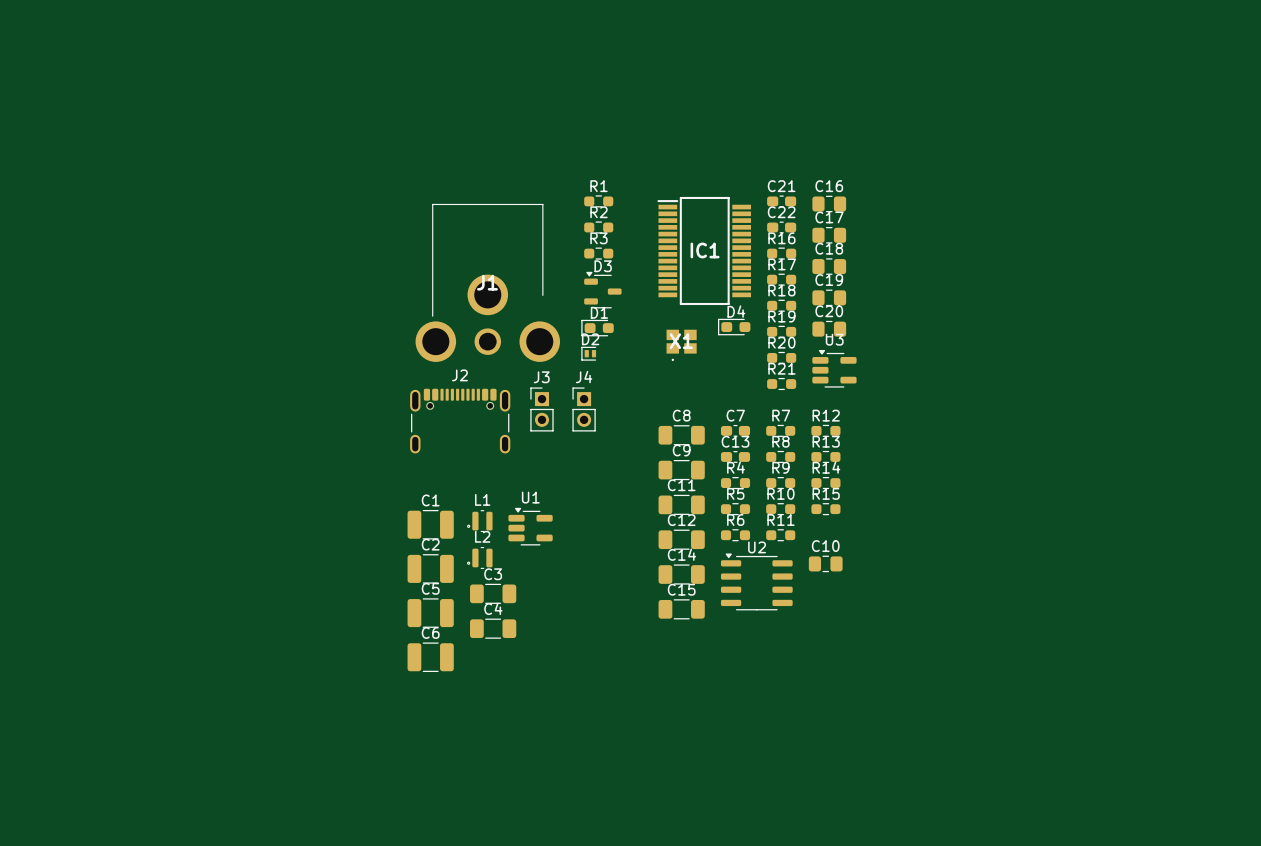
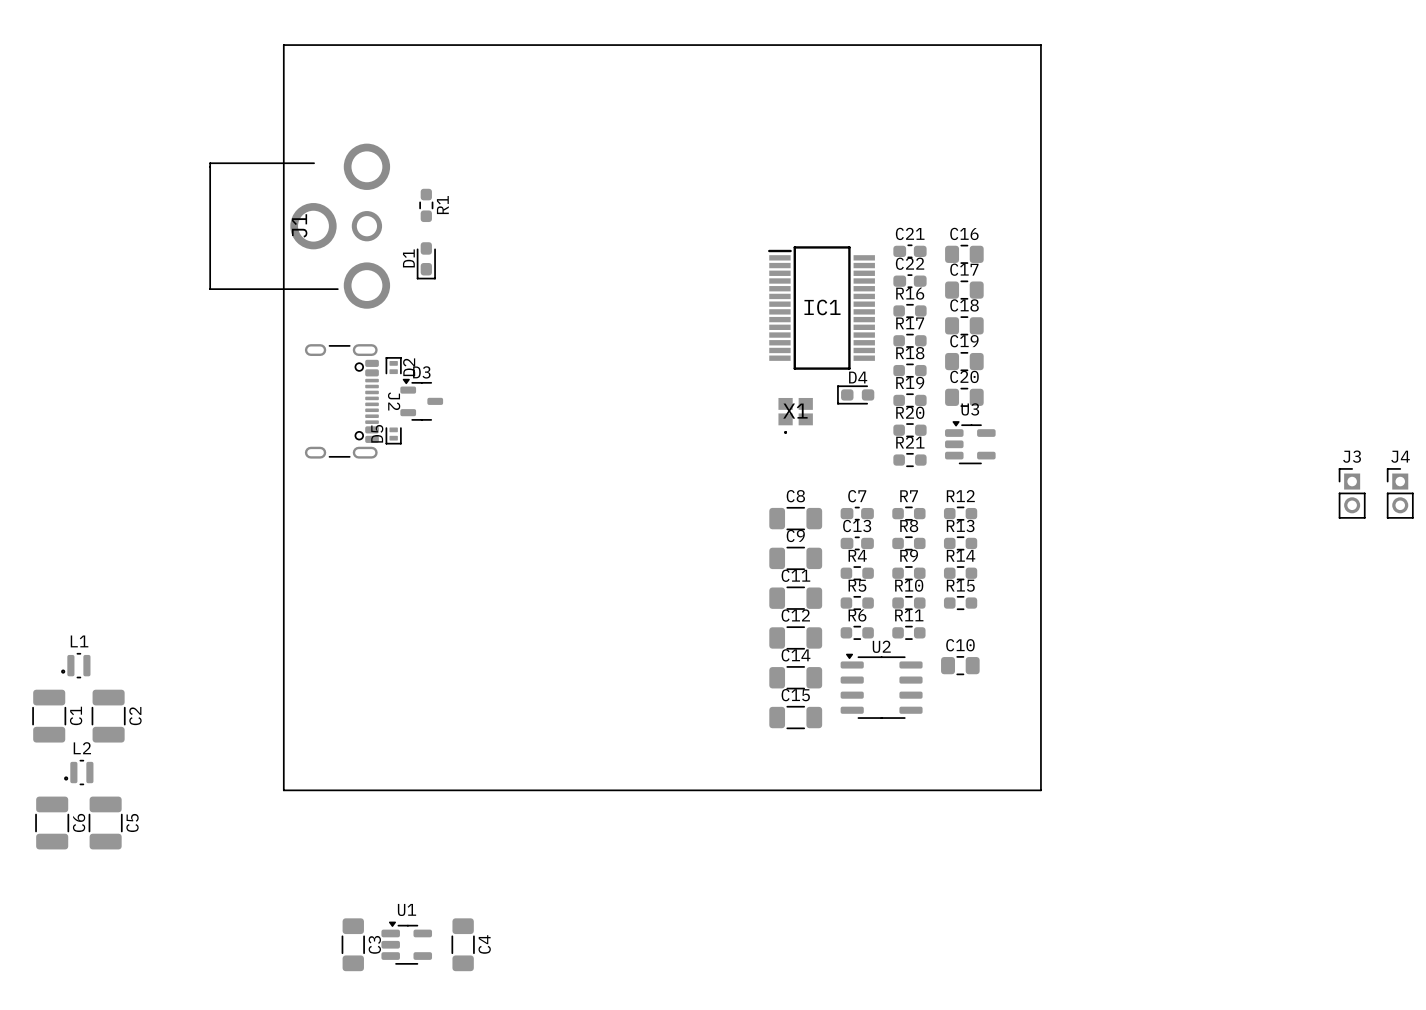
board edge: none -> (283, 45) (1040, 45) (1040, 790) (283, 790) (283, 45)
R1 rotation: 0° (598, 201) -> 90° clockwise (426, 205)
R1 position: (598, 201) -> (426, 205)
R2: (598, 227) -> none
R3: (598, 253) -> none
J1 rotation: 0° (487, 282) -> 90° counterclockwise (299, 226)
J1 position: (487, 282) -> (299, 226)
D3 position: (602, 290) -> (421, 399)
D1 rotation: 0° (597, 328) -> 90° counterclockwise (426, 260)
D1 position: (597, 328) -> (426, 260)
D2 rotation: 0° (588, 353) -> 90° clockwise (393, 365)
D2 position: (588, 353) -> (393, 365)
D5: none -> (393, 435)
J3 position: (541, 409) -> (1352, 493)
J4 position: (584, 409) -> (1400, 493)
J2 rotation: 0° (460, 421) -> 90° clockwise (341, 401)
J2 position: (460, 421) -> (341, 401)
L1 position: (479, 521) -> (75, 665)
C1 rotation: 0° (430, 524) -> 90° clockwise (49, 716)
C1 position: (430, 524) -> (49, 716)
U1 position: (530, 526) -> (406, 943)
L2 position: (479, 557) -> (78, 772)
C2 rotation: 0° (430, 568) -> 90° clockwise (108, 716)
C2 position: (430, 568) -> (108, 716)
C3 rotation: 0° (493, 593) -> 90° clockwise (353, 944)
C3 position: (493, 593) -> (353, 944)
C5 rotation: 0° (430, 613) -> 90° clockwise (105, 823)
C5 position: (430, 613) -> (105, 823)
C4 rotation: 0° (493, 628) -> 90° clockwise (463, 944)
C4 position: (493, 628) -> (463, 944)
C6 rotation: 0° (430, 657) -> 90° clockwise (52, 823)
C6 position: (430, 657) -> (52, 823)

